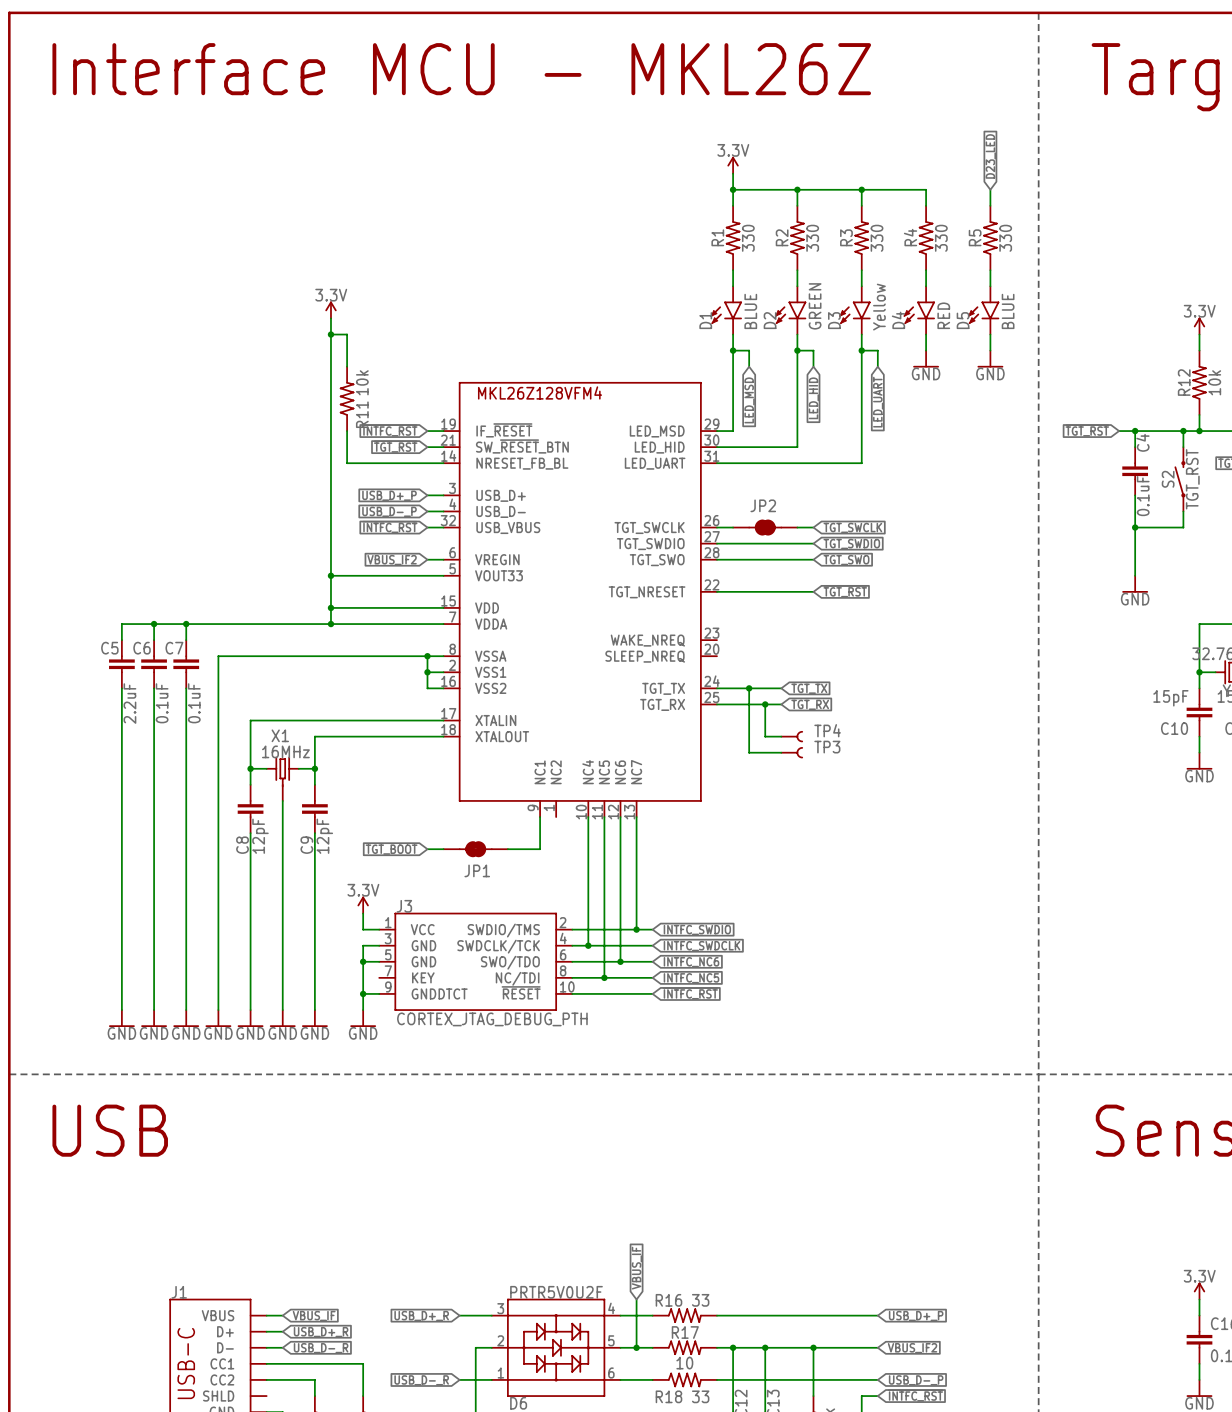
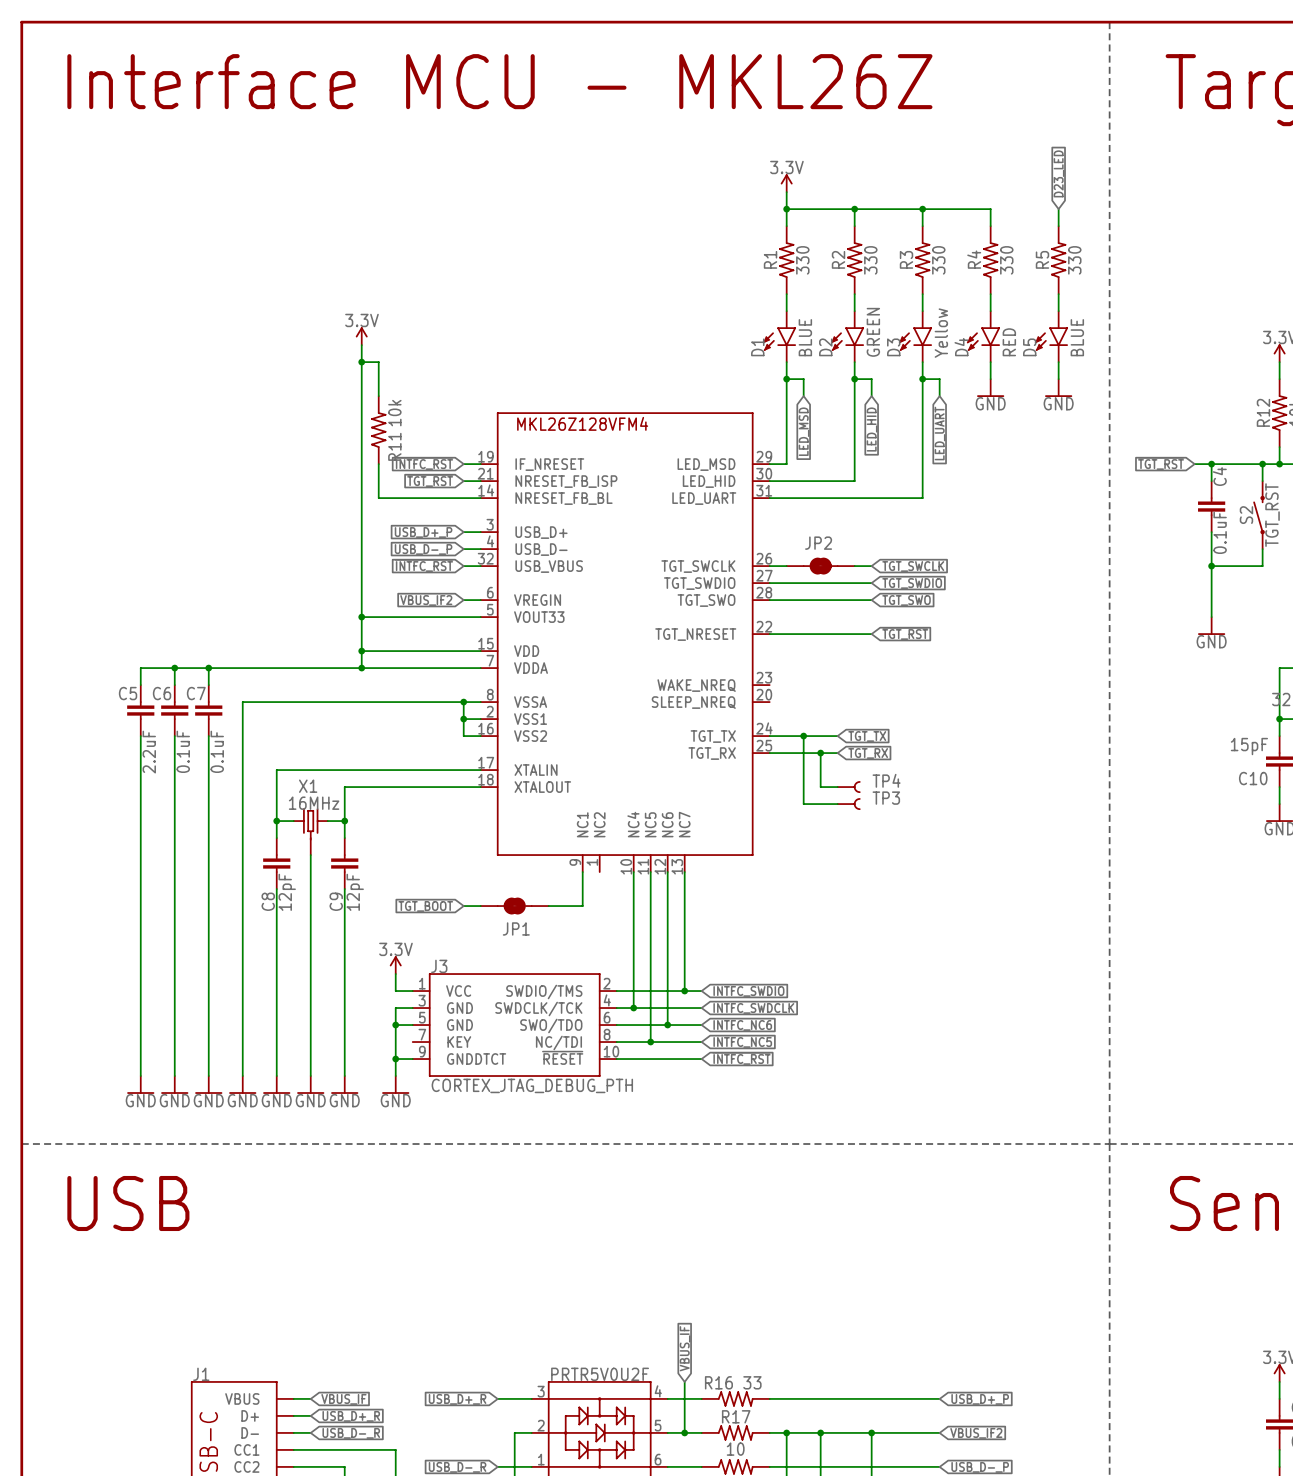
part pin name: IF_~{RESET} (504, 430) -> IF_NRESET (549, 464)
part pin name: SW_~{RESET}_BTN (522, 446) -> NRESET_FB_ISP (566, 481)

